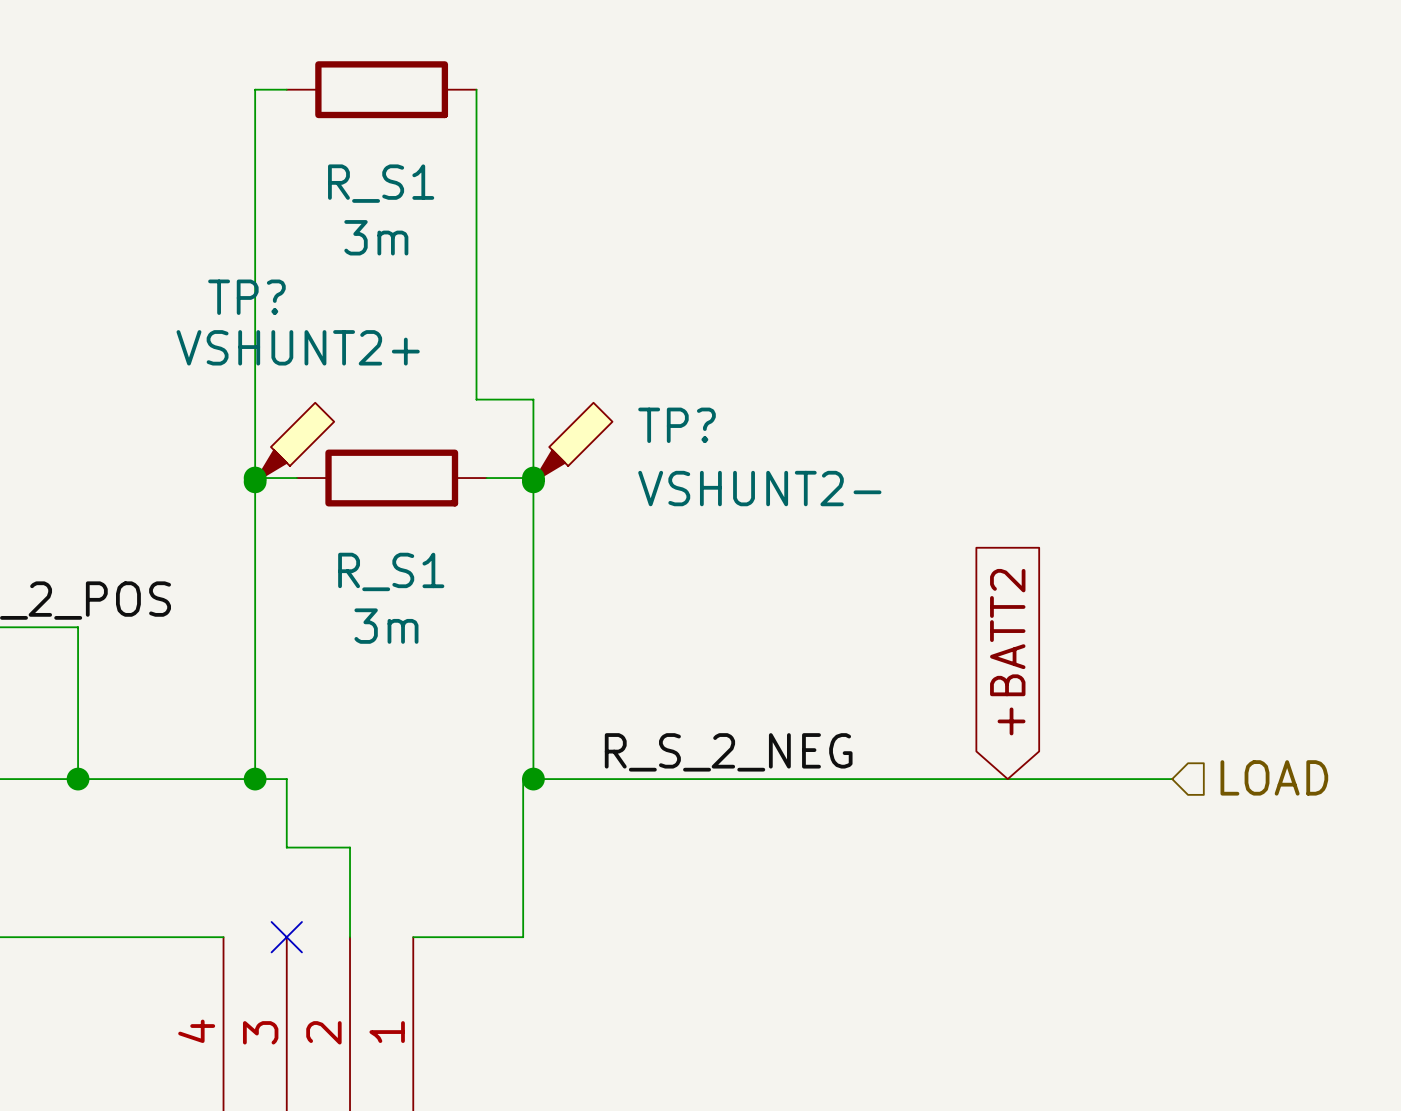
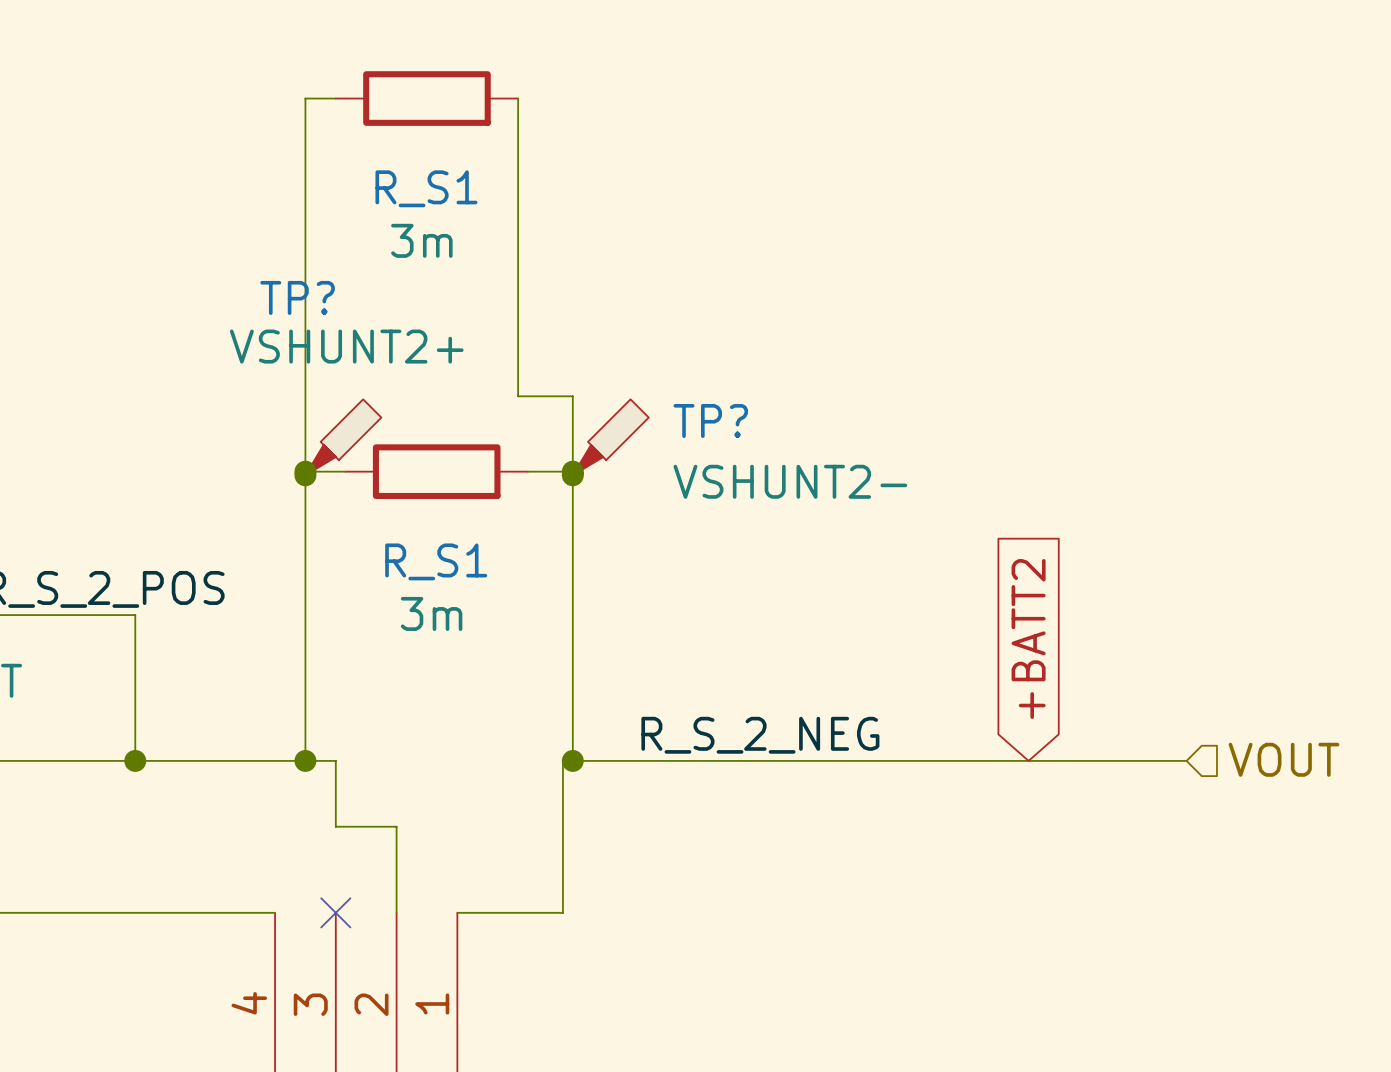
hierarchical label: LOAD (1274, 777) -> VOUT (1284, 759)

